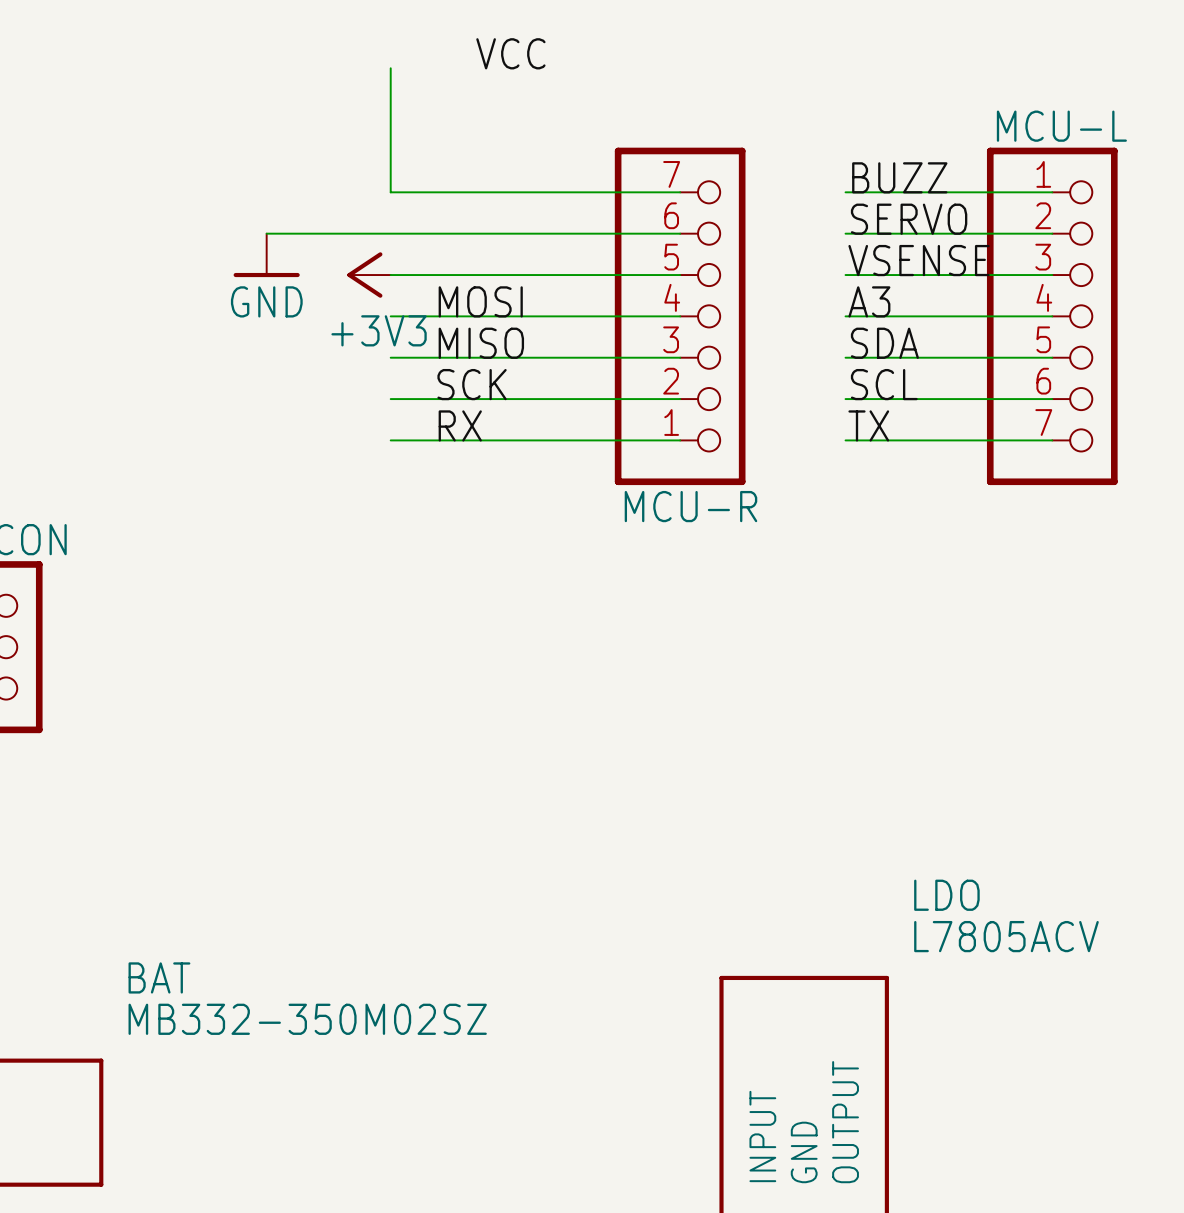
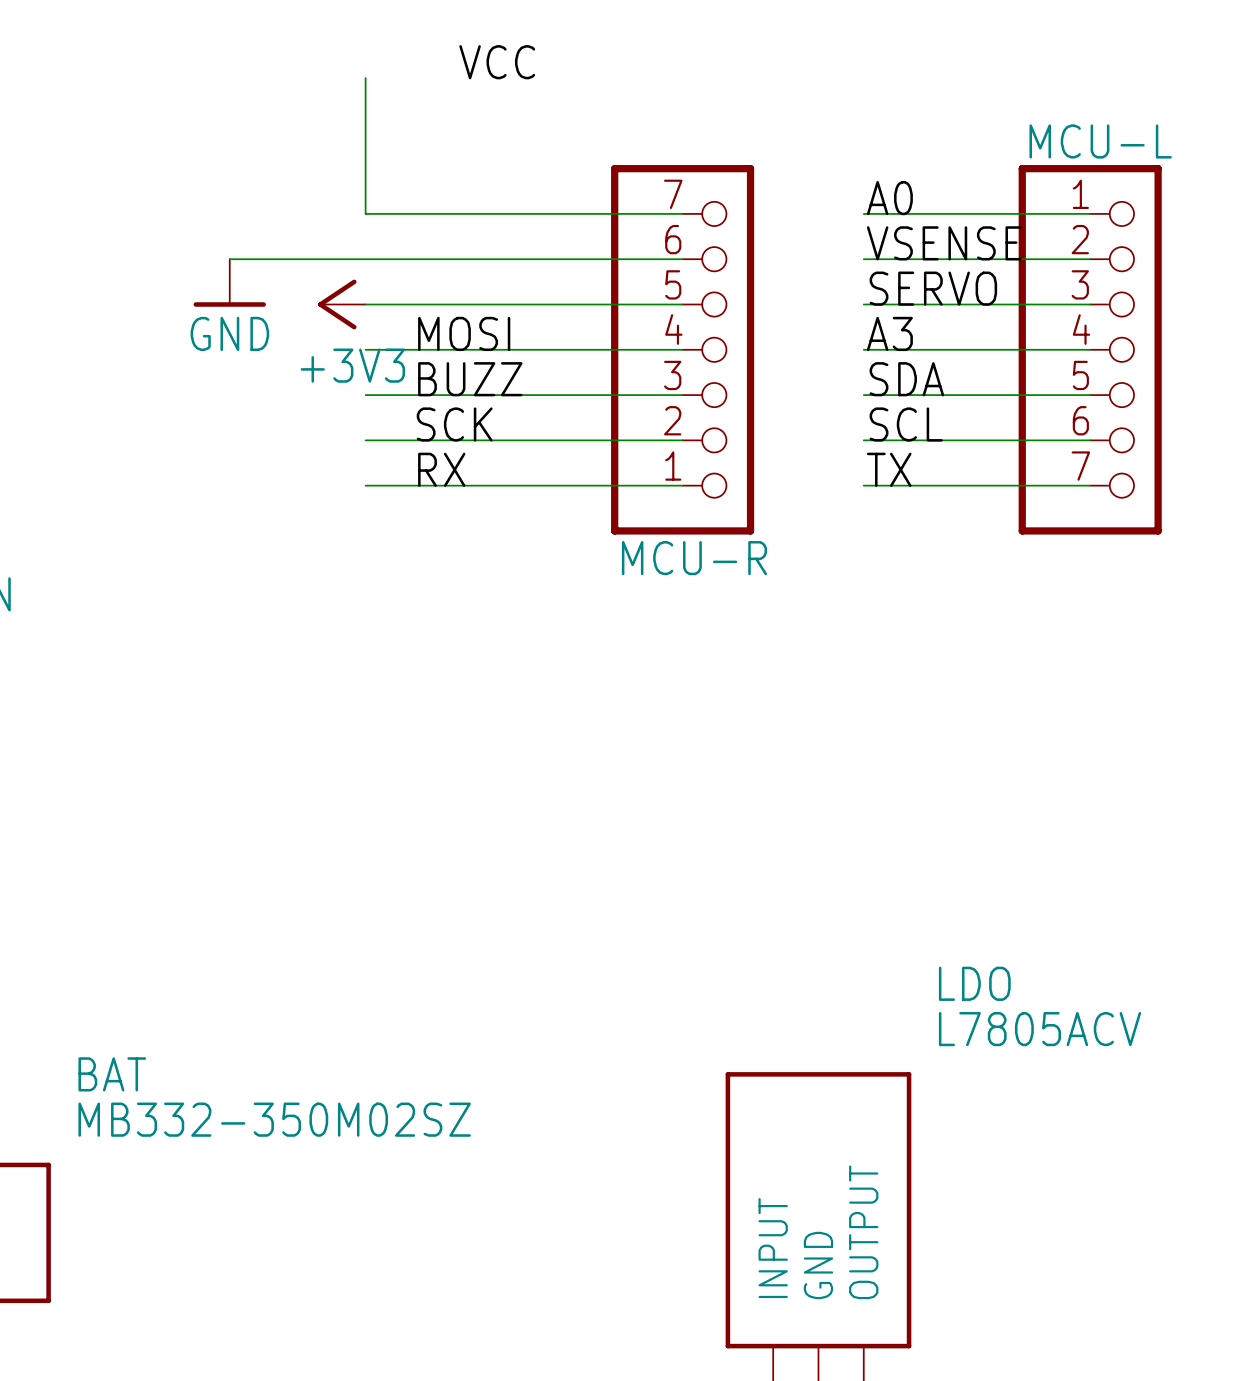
label: BUZZ (899, 177) -> A0 (889, 198)
label: SERVO (909, 219) -> VSENSE (944, 243)
label: VSENSE (919, 260) -> SERVO (933, 288)
label: MISO (481, 343) -> BUZZ (470, 379)

